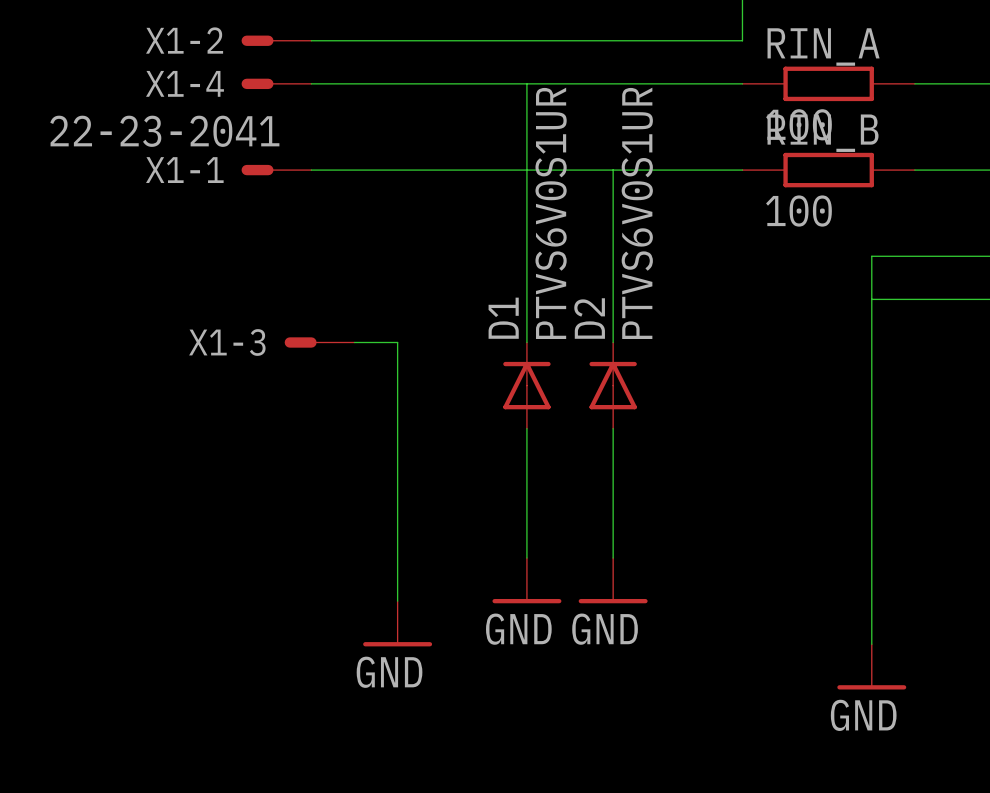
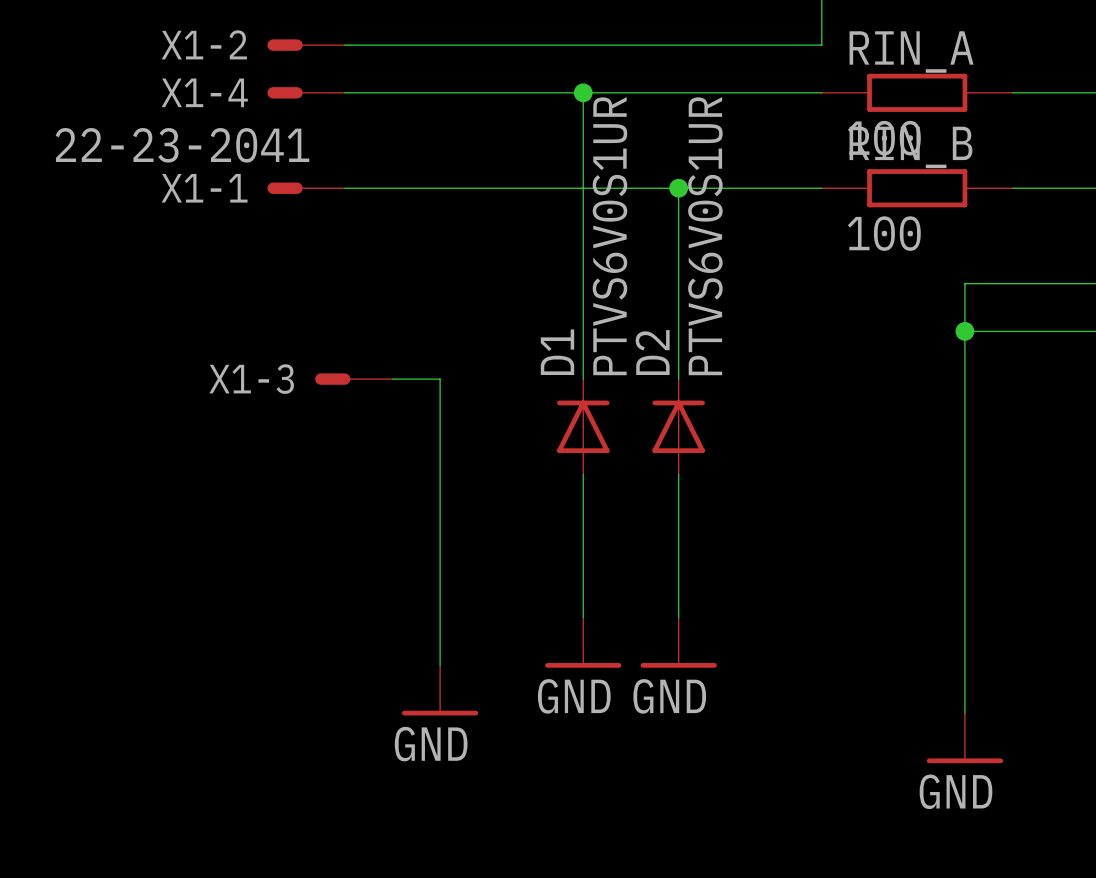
junction: none -> (583, 92)
junction: none -> (678, 188)
junction: none -> (964, 331)

